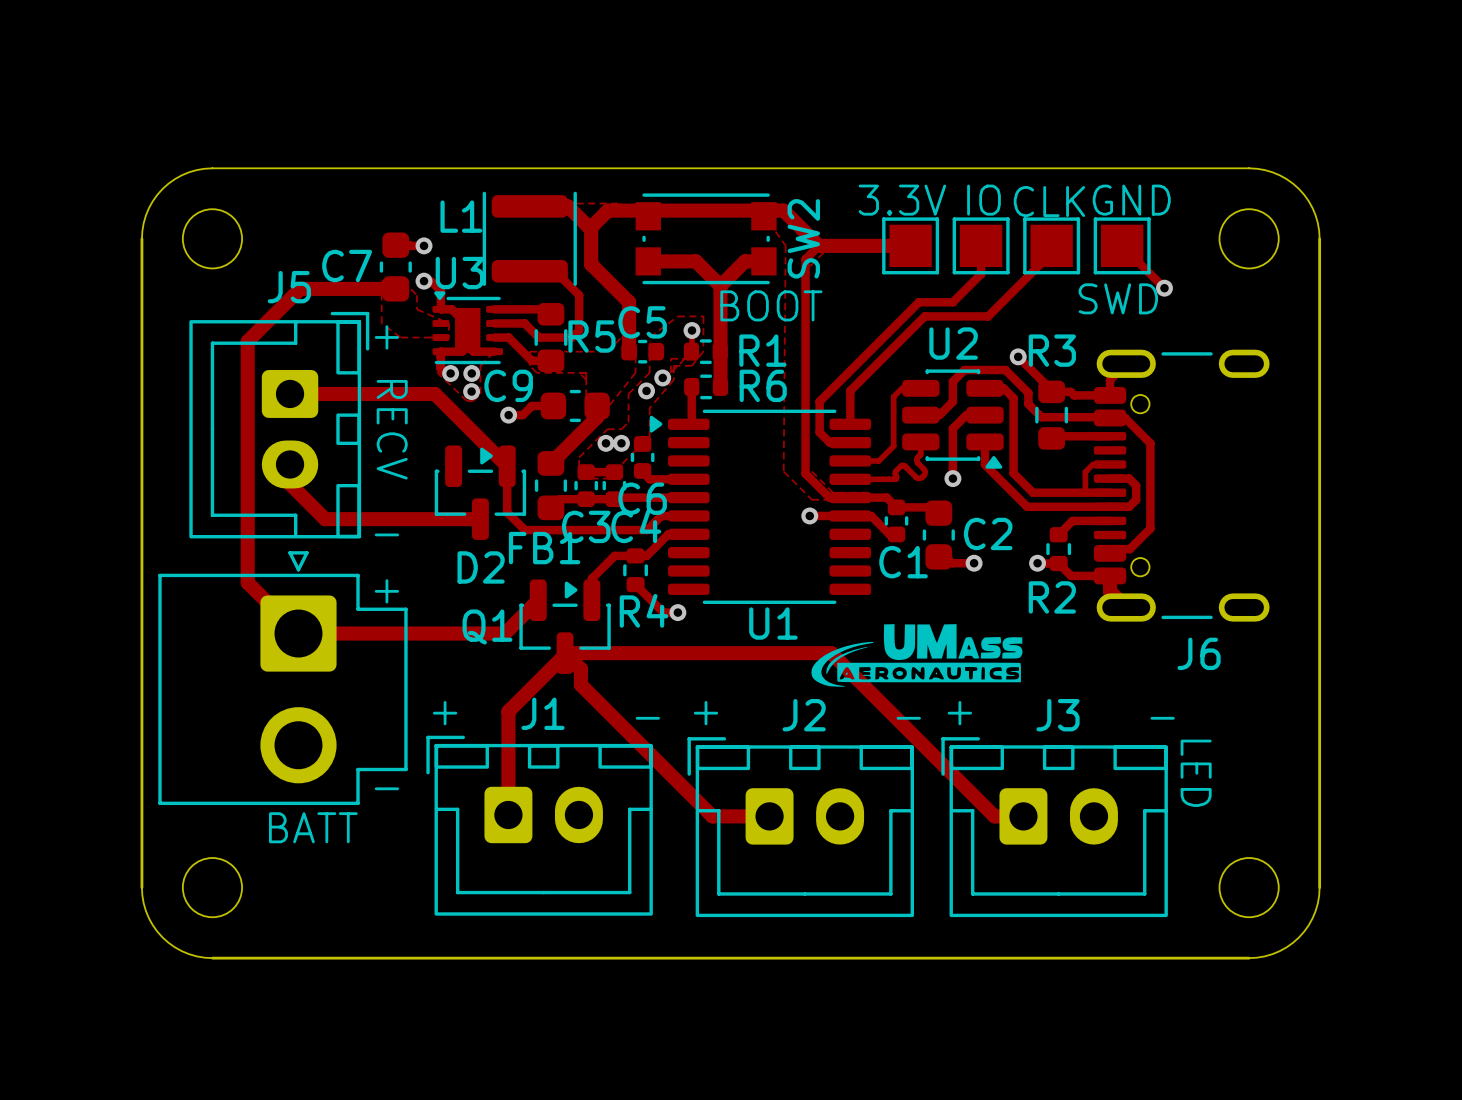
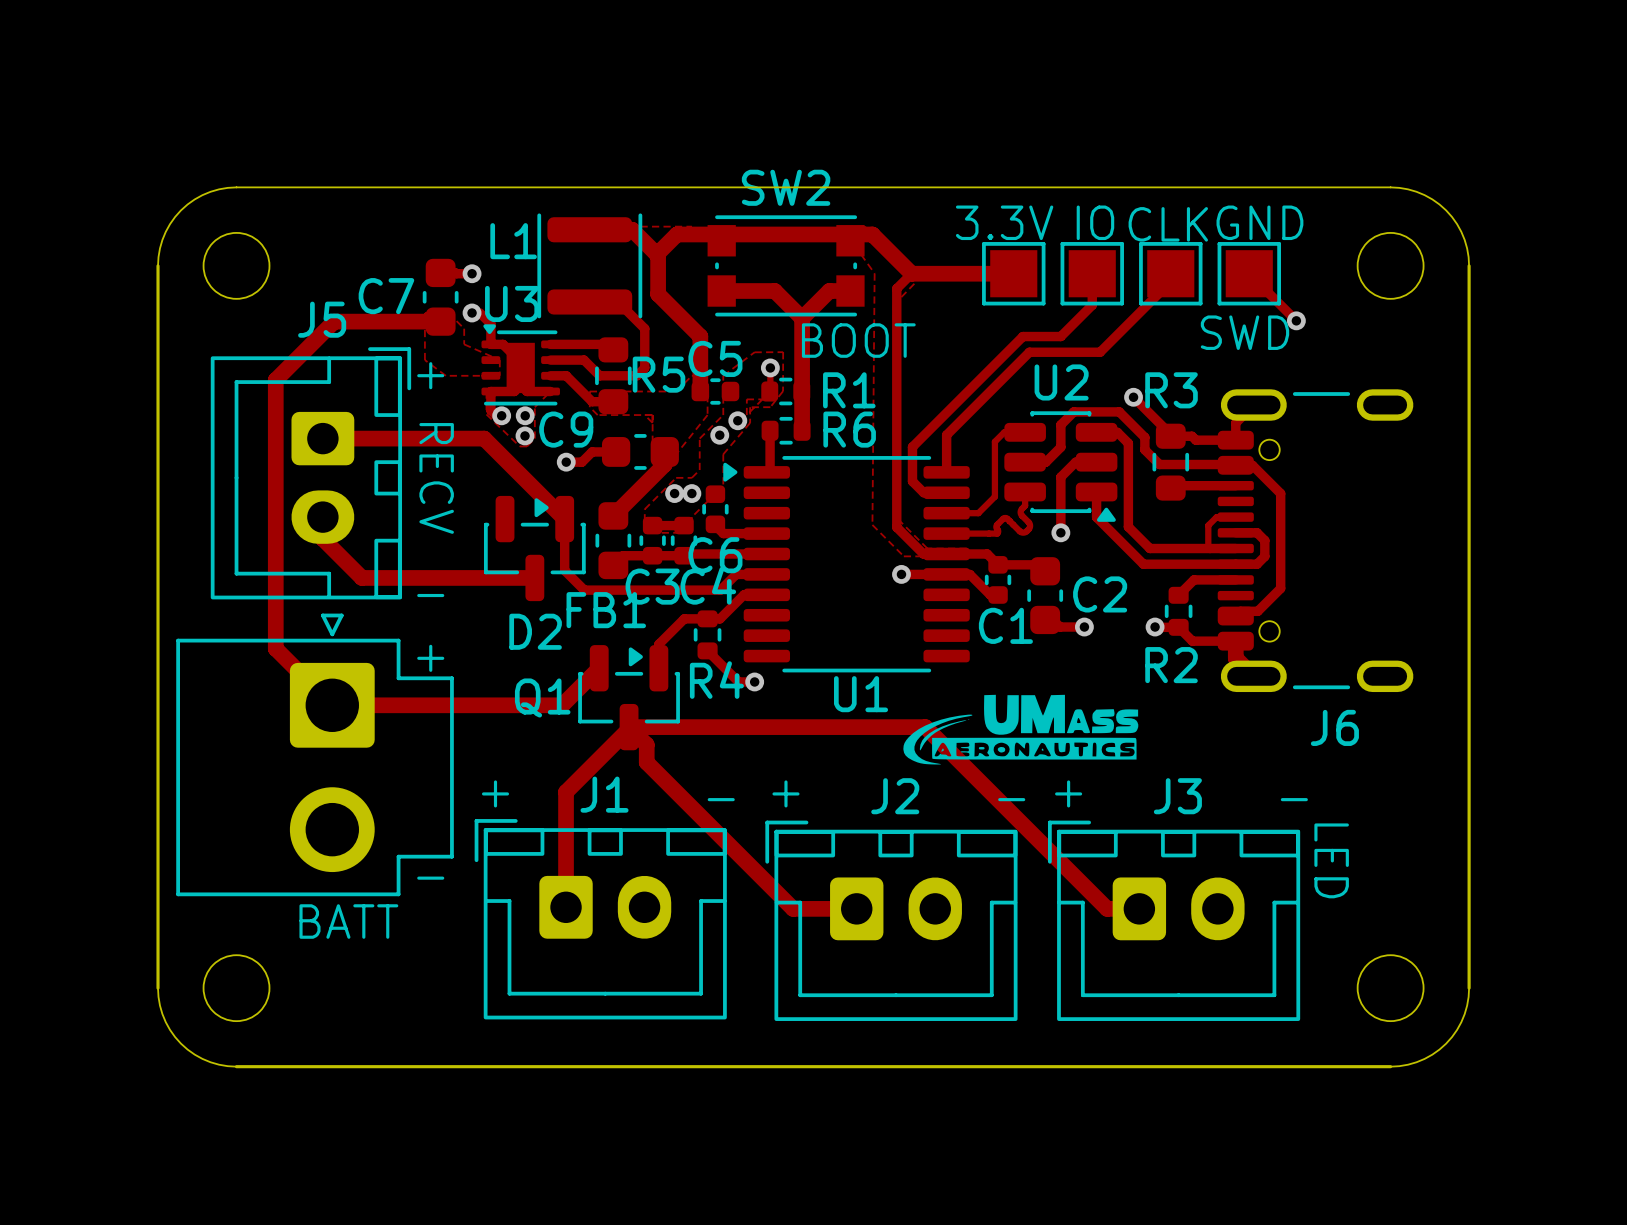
SW2 name rotation: 0° (803, 238) -> 90° clockwise (786, 187)
SW2 name position: SW2 (803, 238) -> SW2 (786, 187)

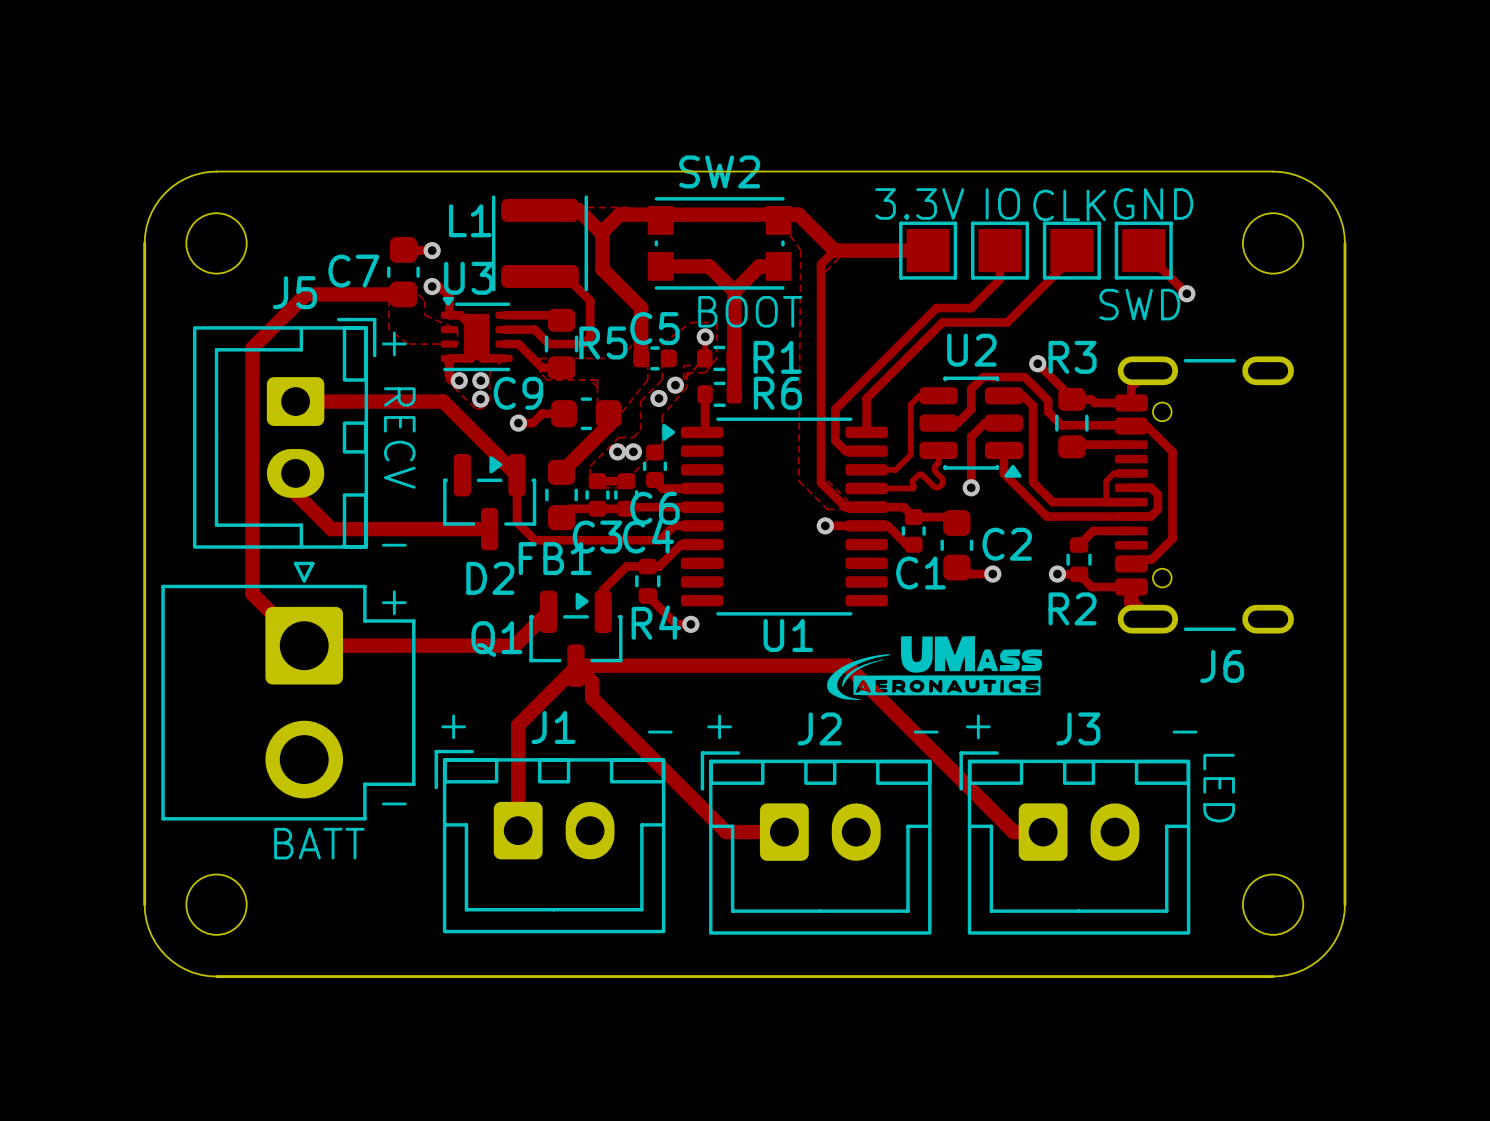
text position: BOOT (858, 340) -> BOOT (750, 311)

